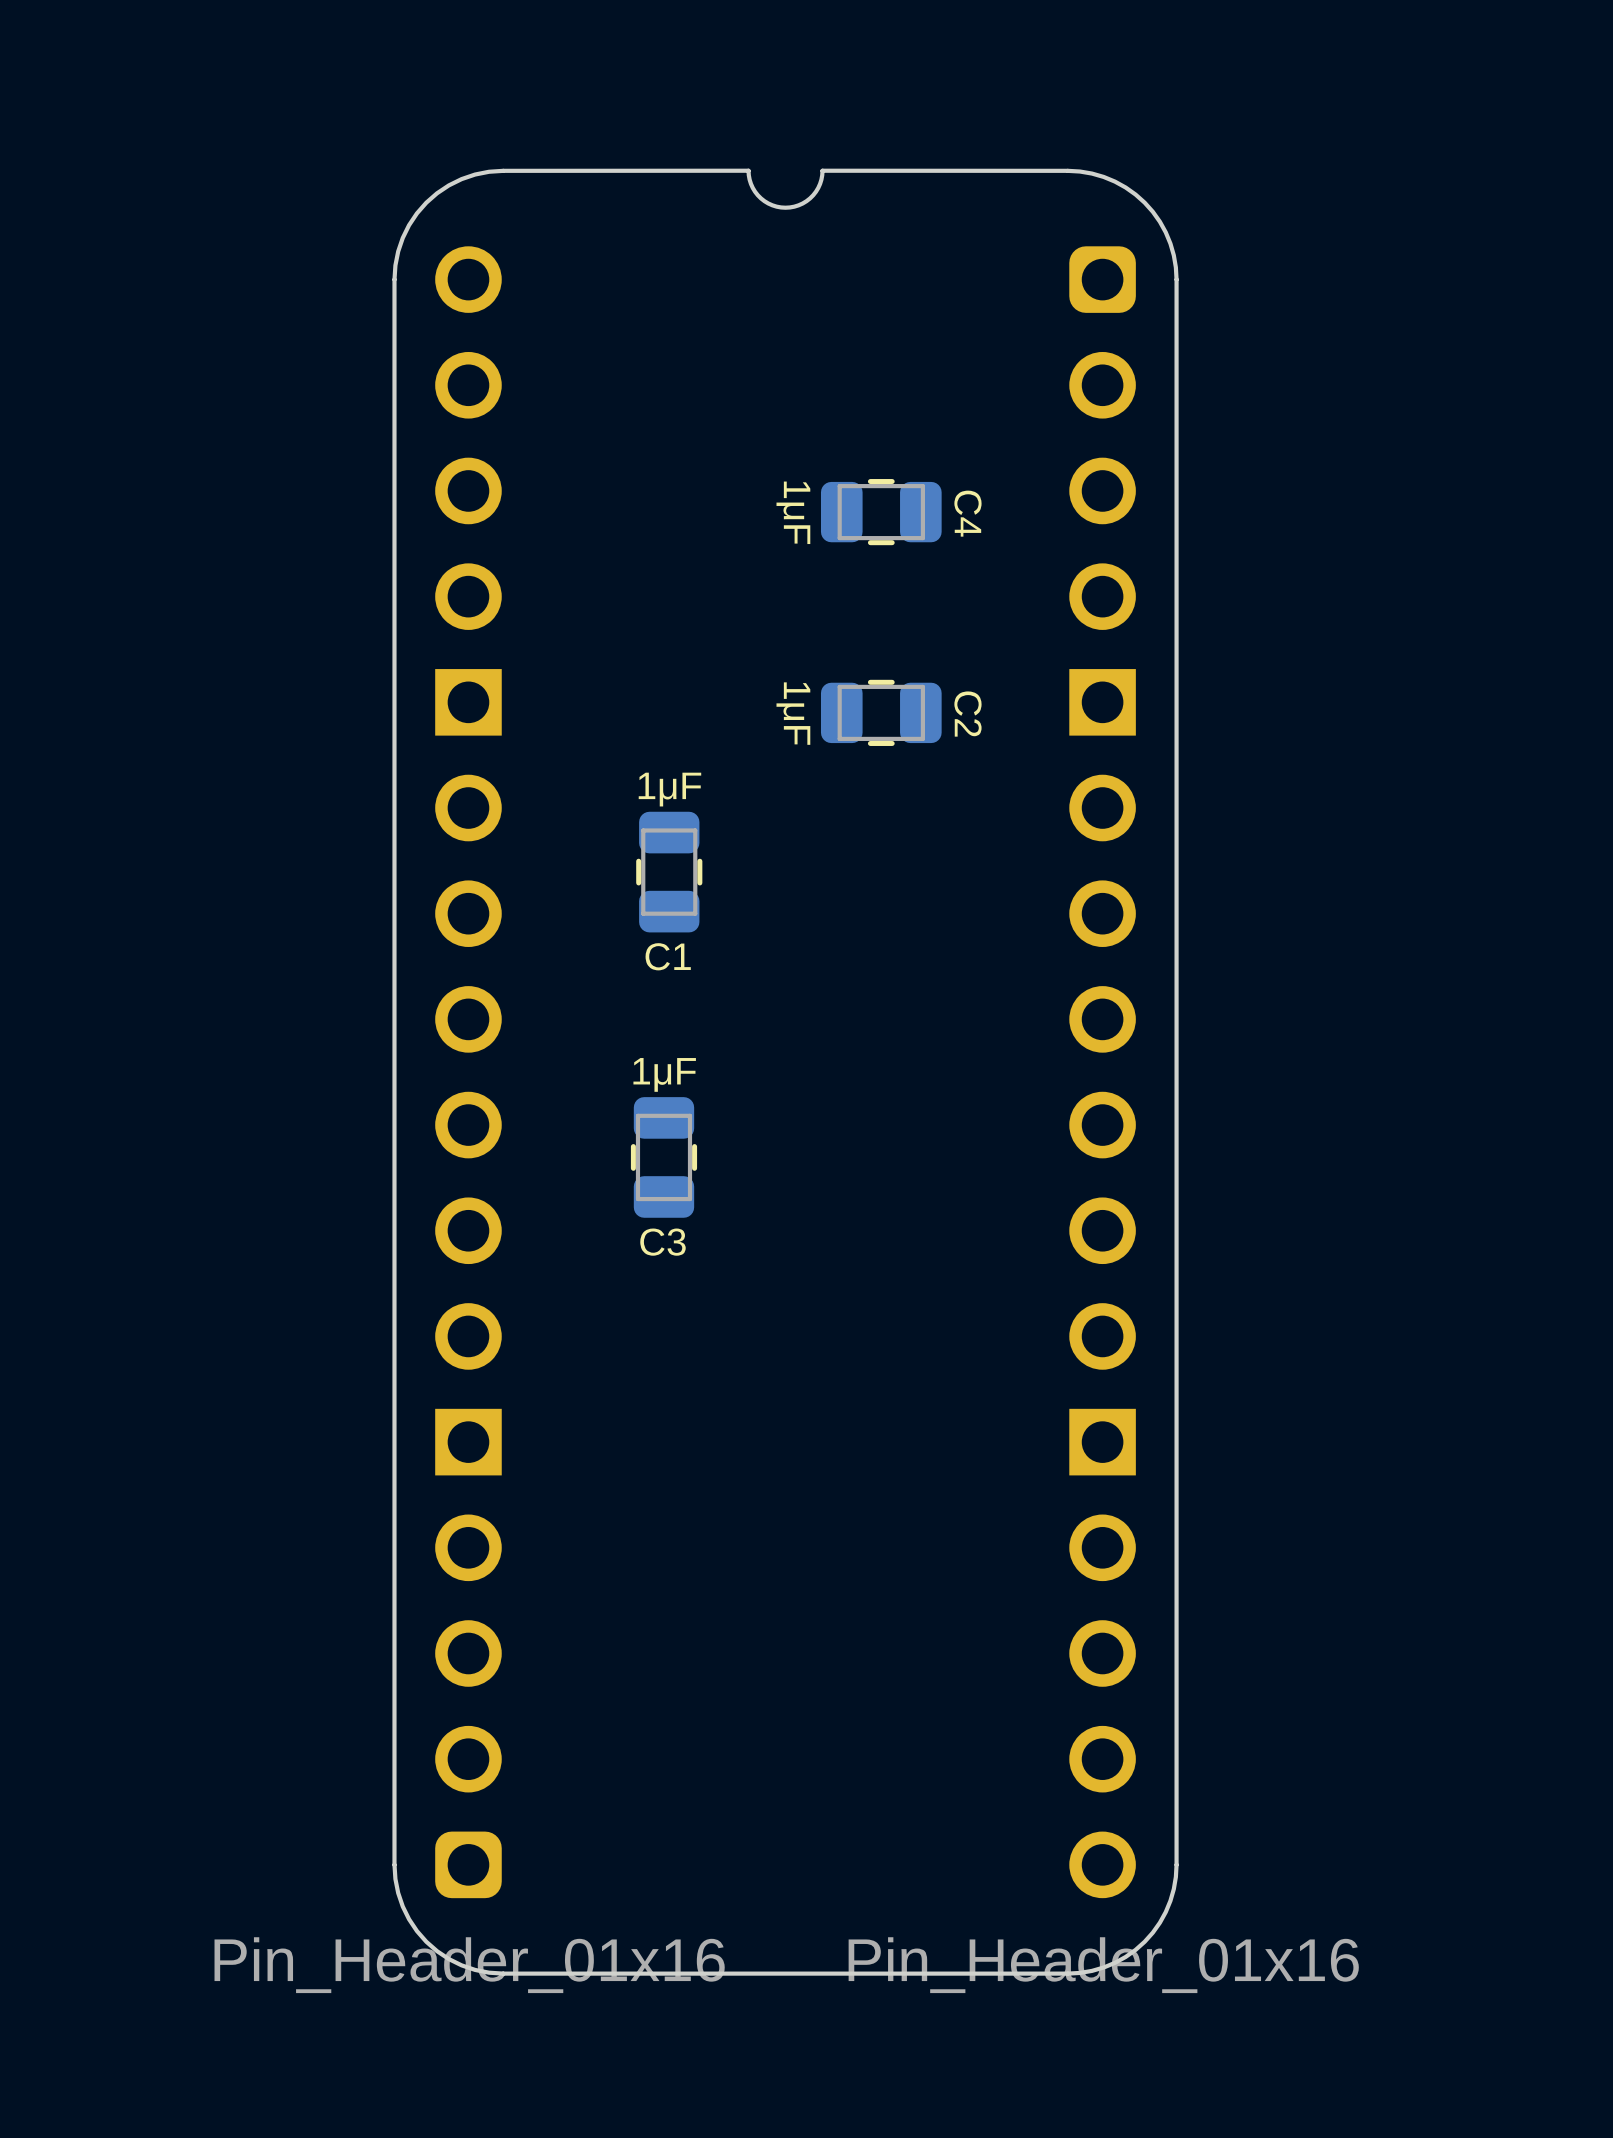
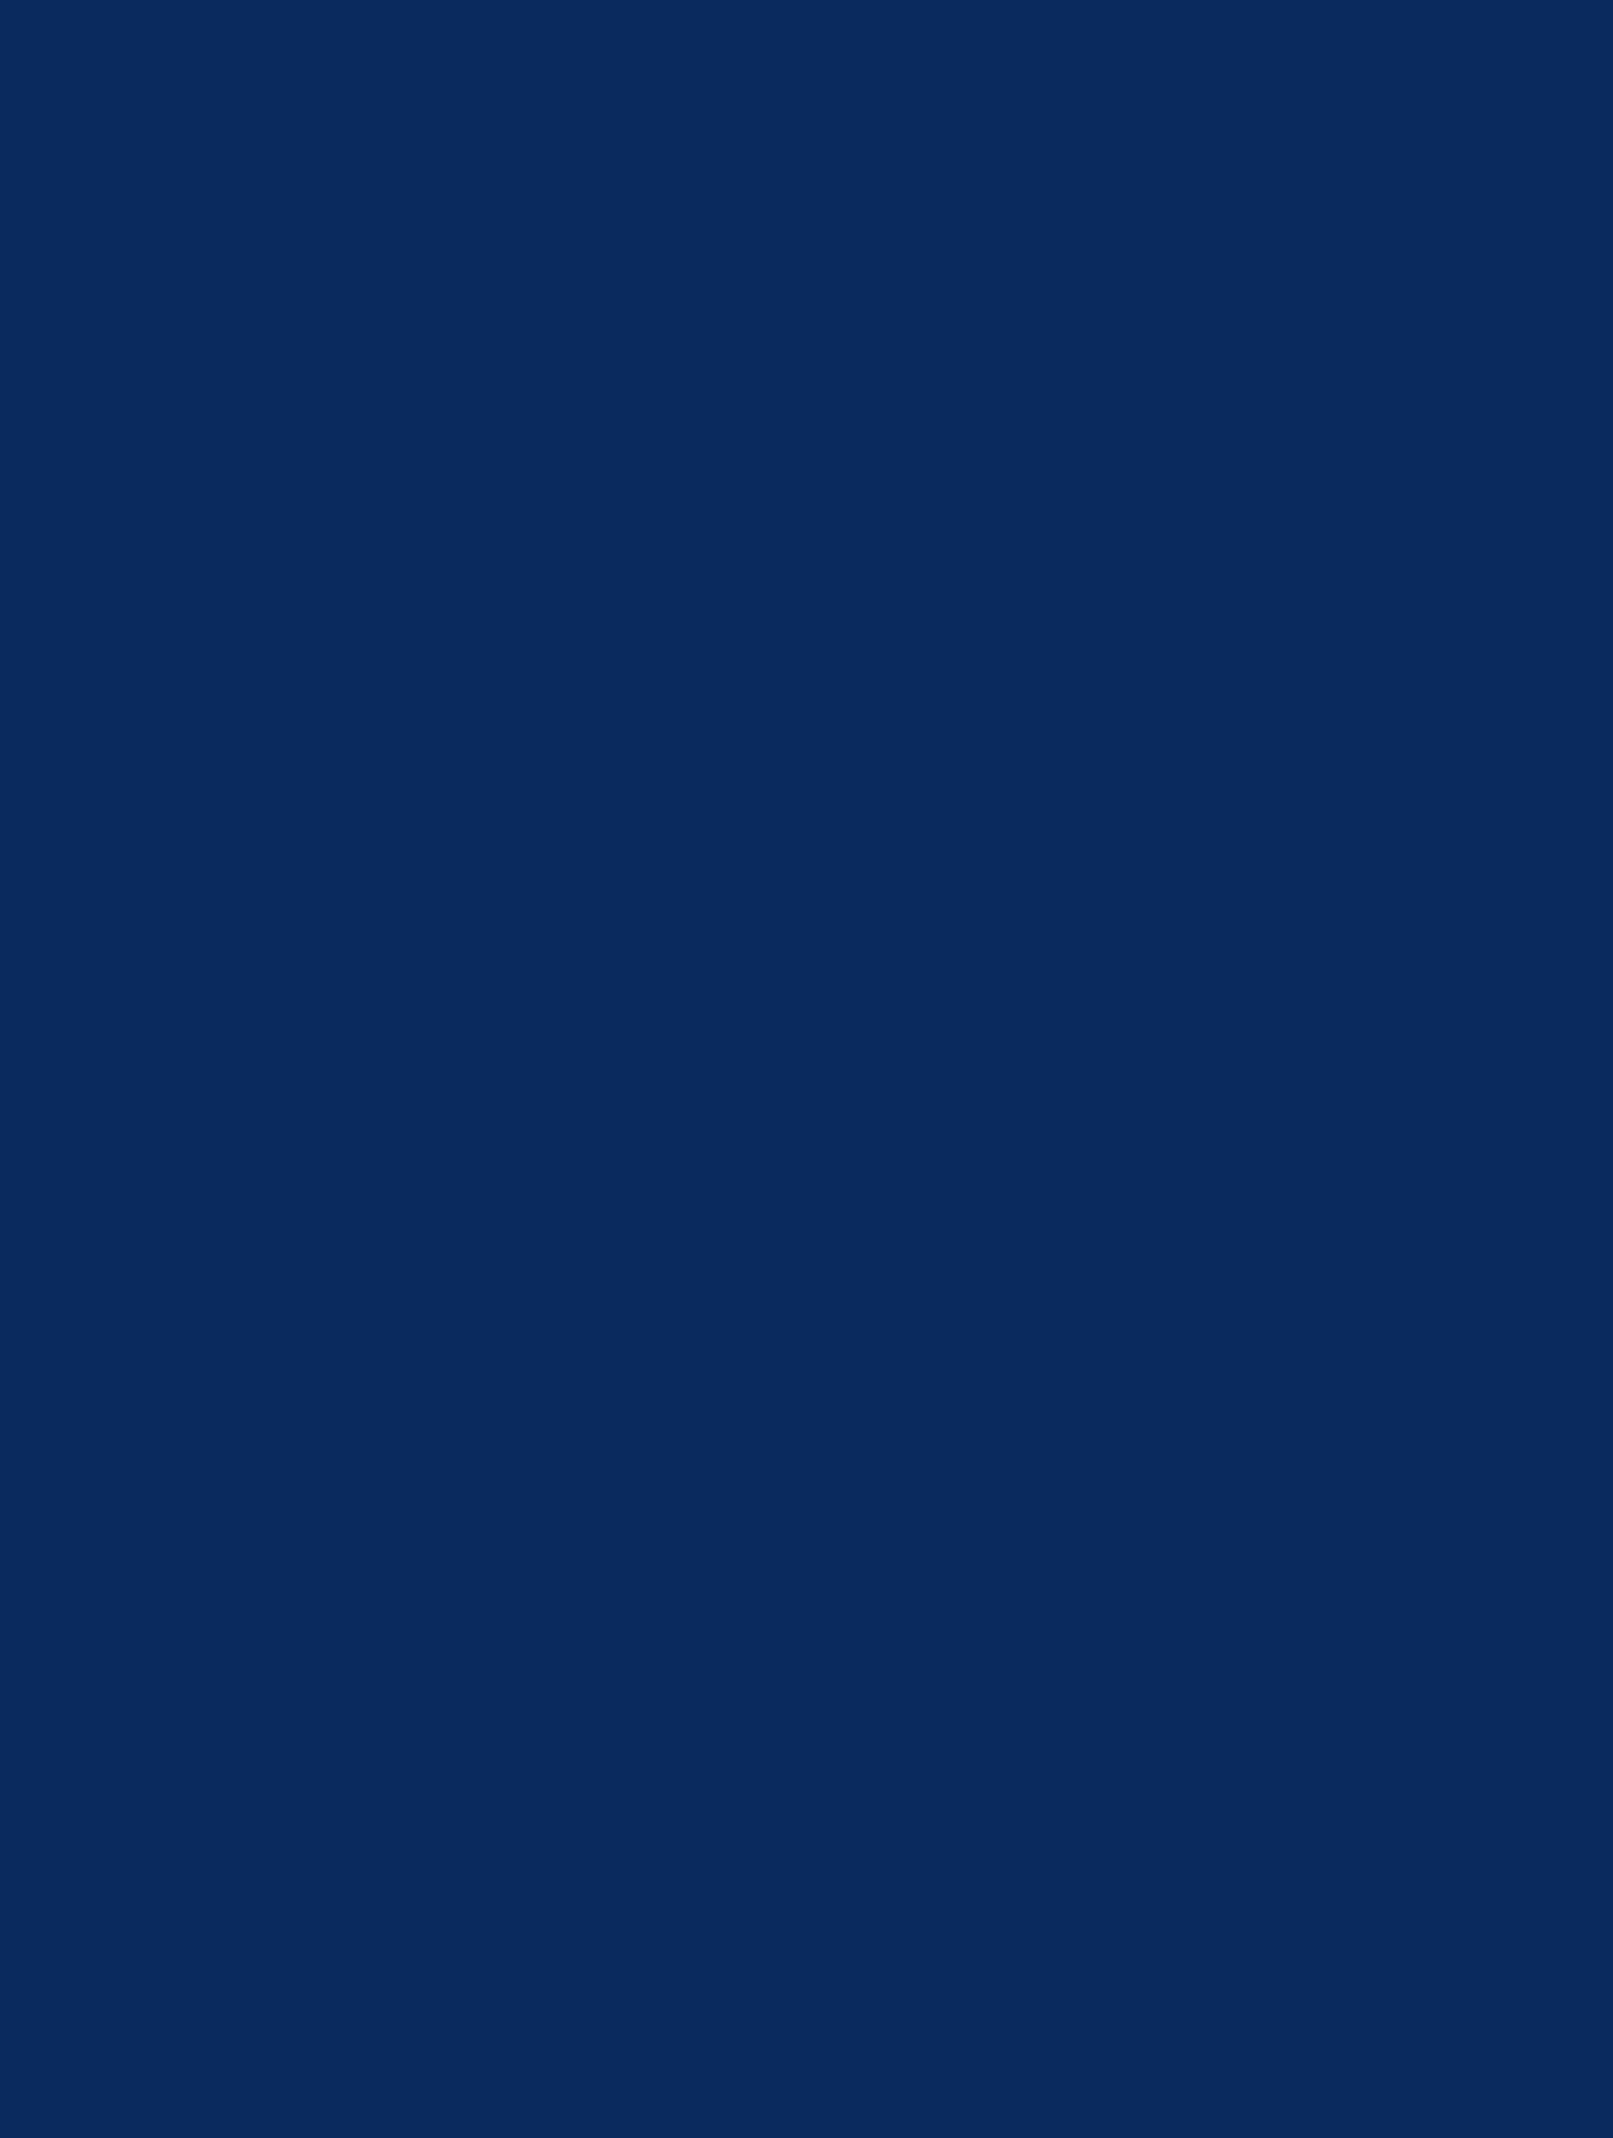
C4: 1μF (881, 512) -> none
C2: 1μF (881, 712) -> none
C1: 1μF (669, 872) -> none
part: (785, 1072) -> none
C3: 1μF (663, 1157) -> none
drawing: [214, 1937, 1359, 1994] -> none

